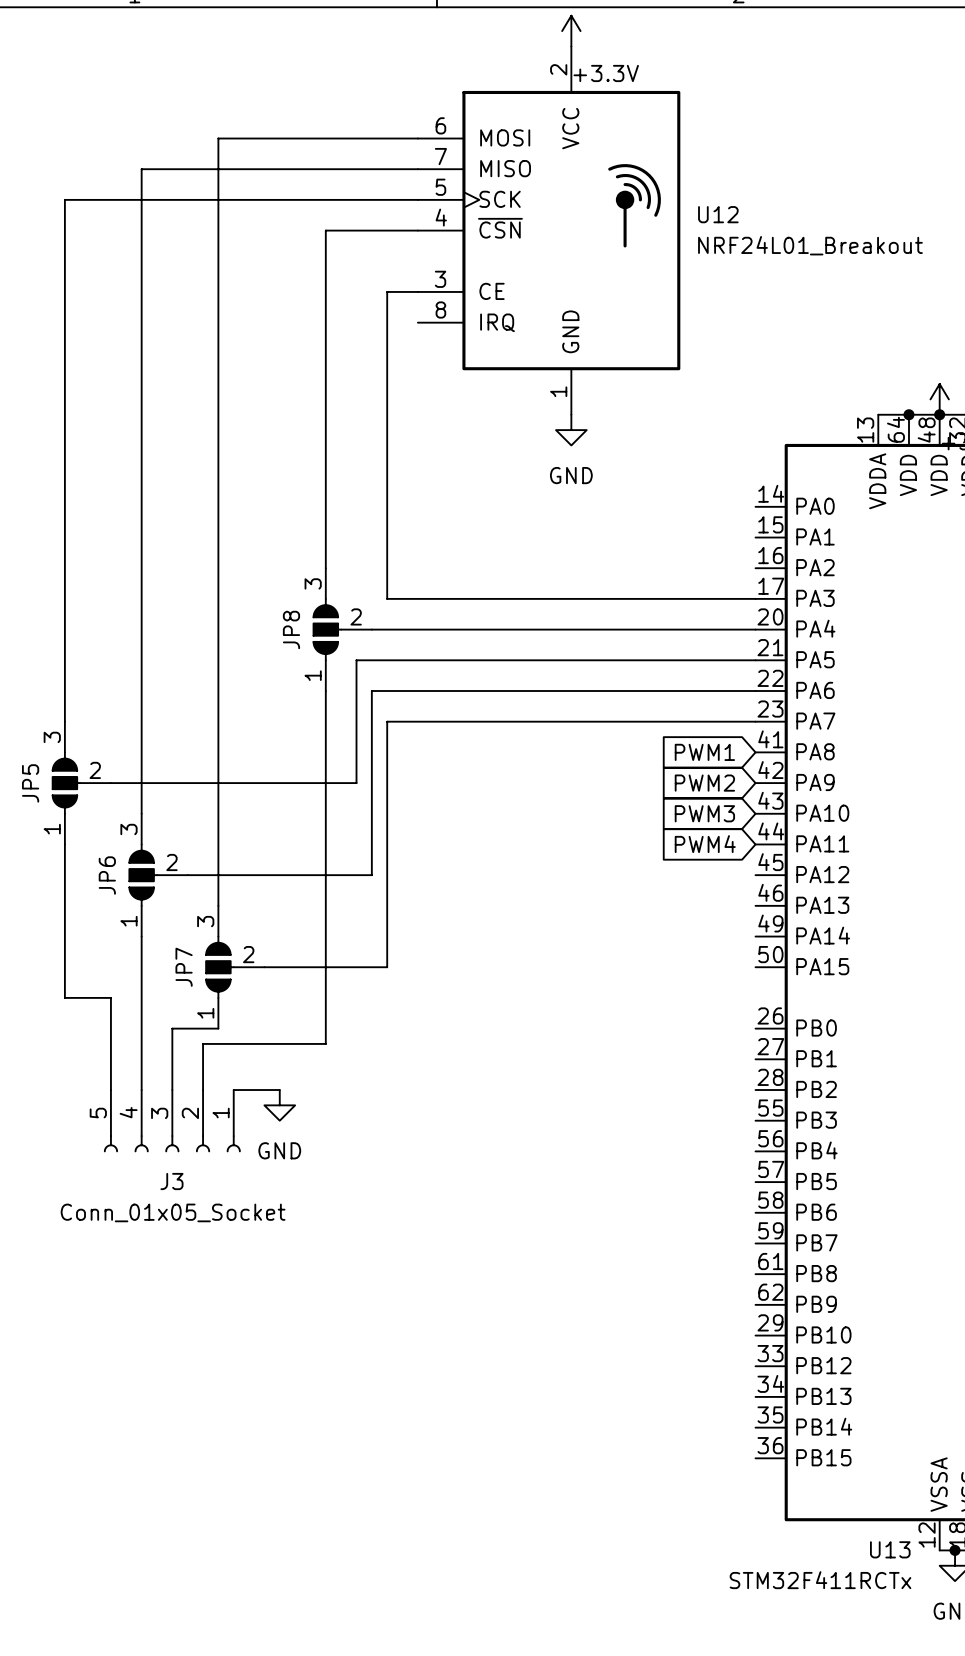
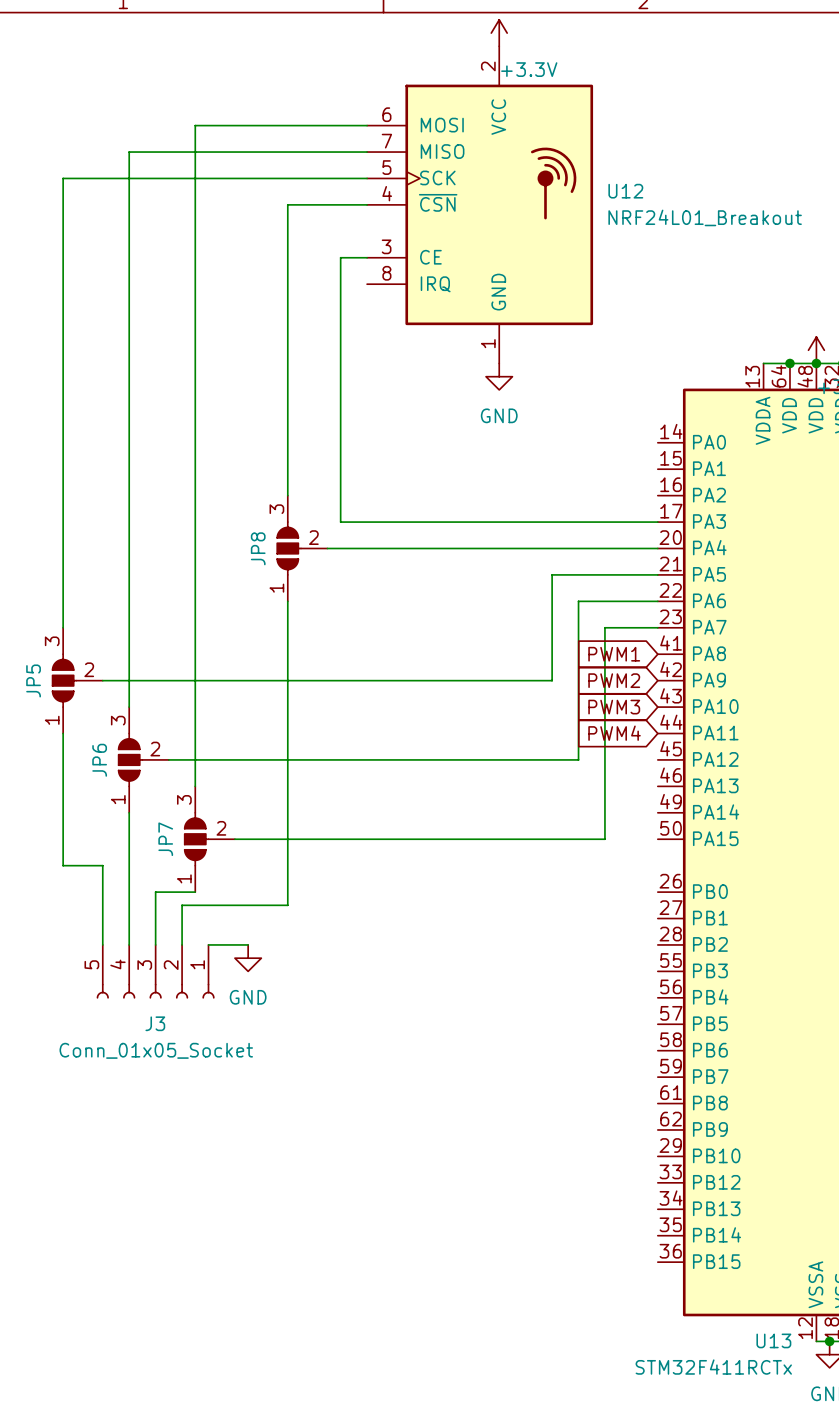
wire: (632, 660) (356, 660) (356, 783) -> (552, 574) (552, 680) (314, 680)
wire: (663, 690) (371, 690) (371, 875) -> (578, 601) (578, 759) (327, 759)
wire: (694, 721) (387, 721) (387, 967) -> (604, 627) (604, 839) (340, 839)

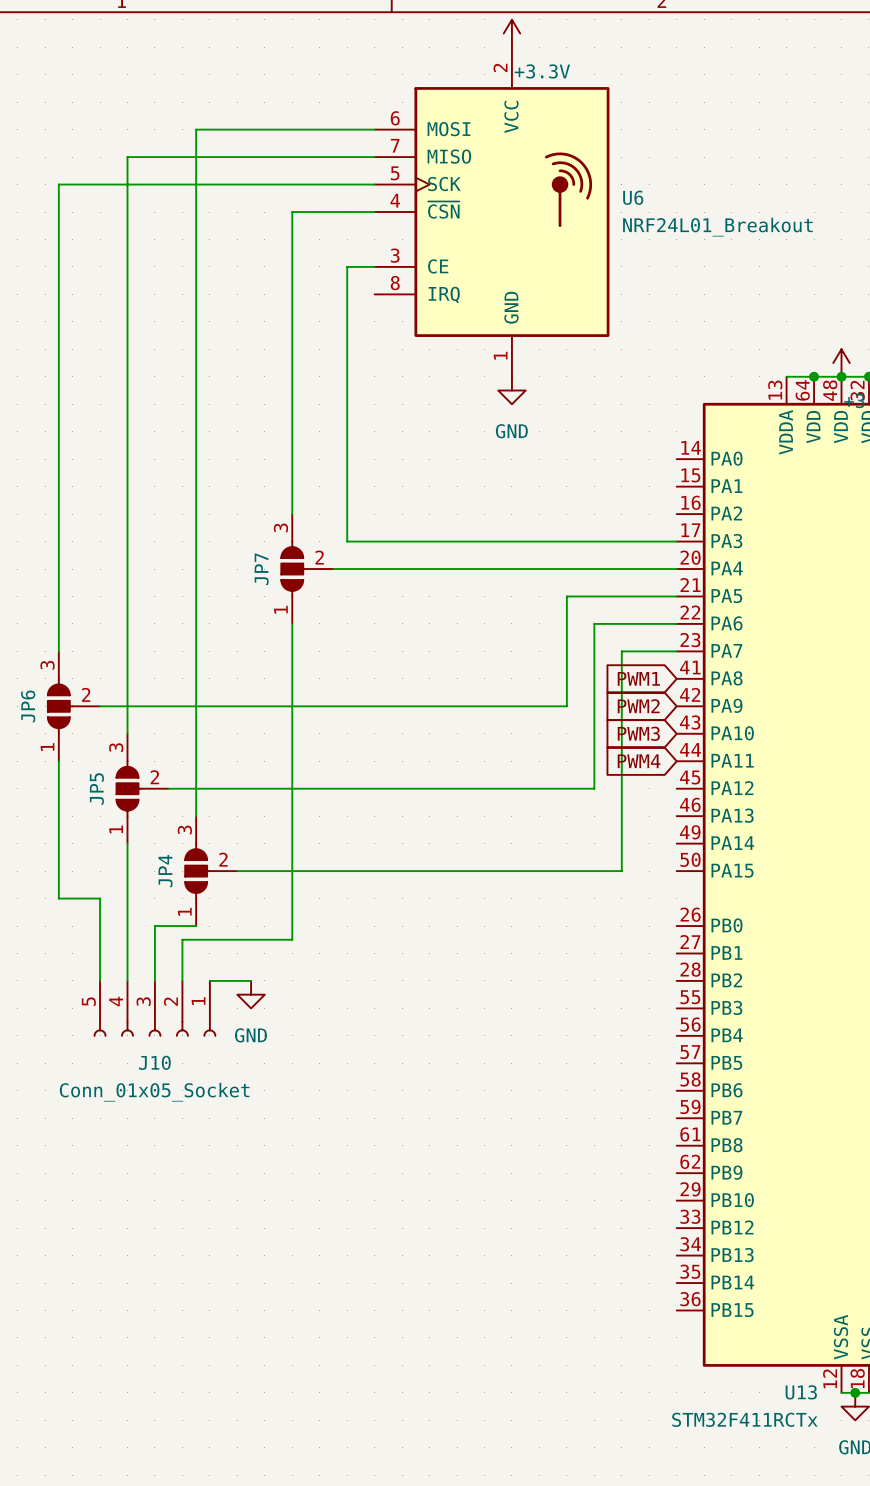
U12 name: U12 (625, 191) -> U6 (633, 197)
JP8 name: JP8 (258, 548) -> JP7 (261, 569)
JP5 name: JP5 (33, 680) -> JP6 (28, 706)
JP6 name: JP6 (99, 760) -> JP5 (96, 788)
JP7 name: JP7 (165, 839) -> JP4 (165, 871)
J3 name: J3 (155, 1023) -> J10 (154, 1062)

